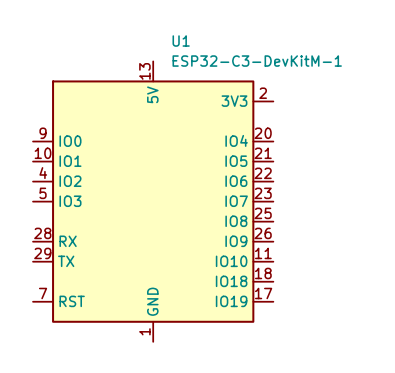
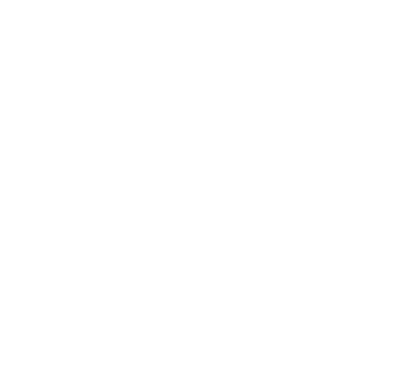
U1: ESP32-C3-DevKitM-1 (153, 201) -> none

